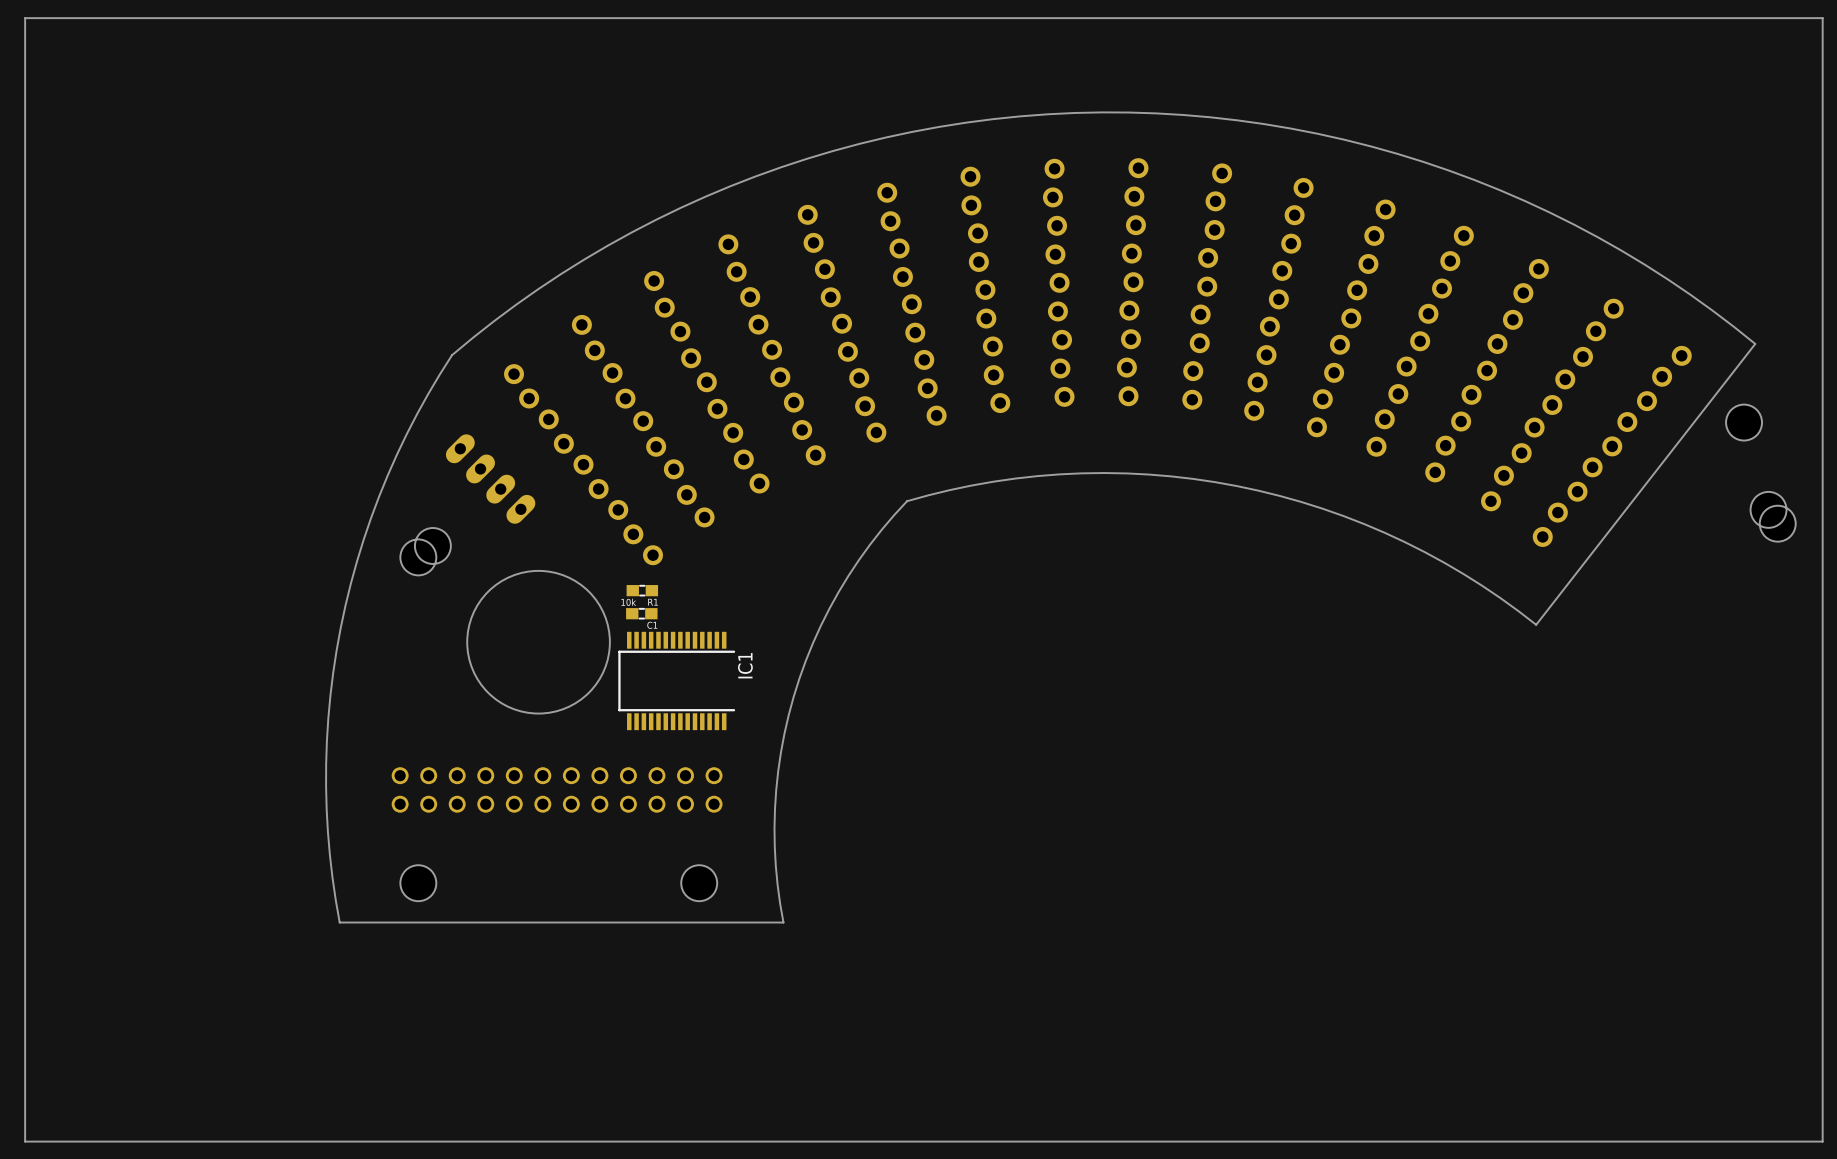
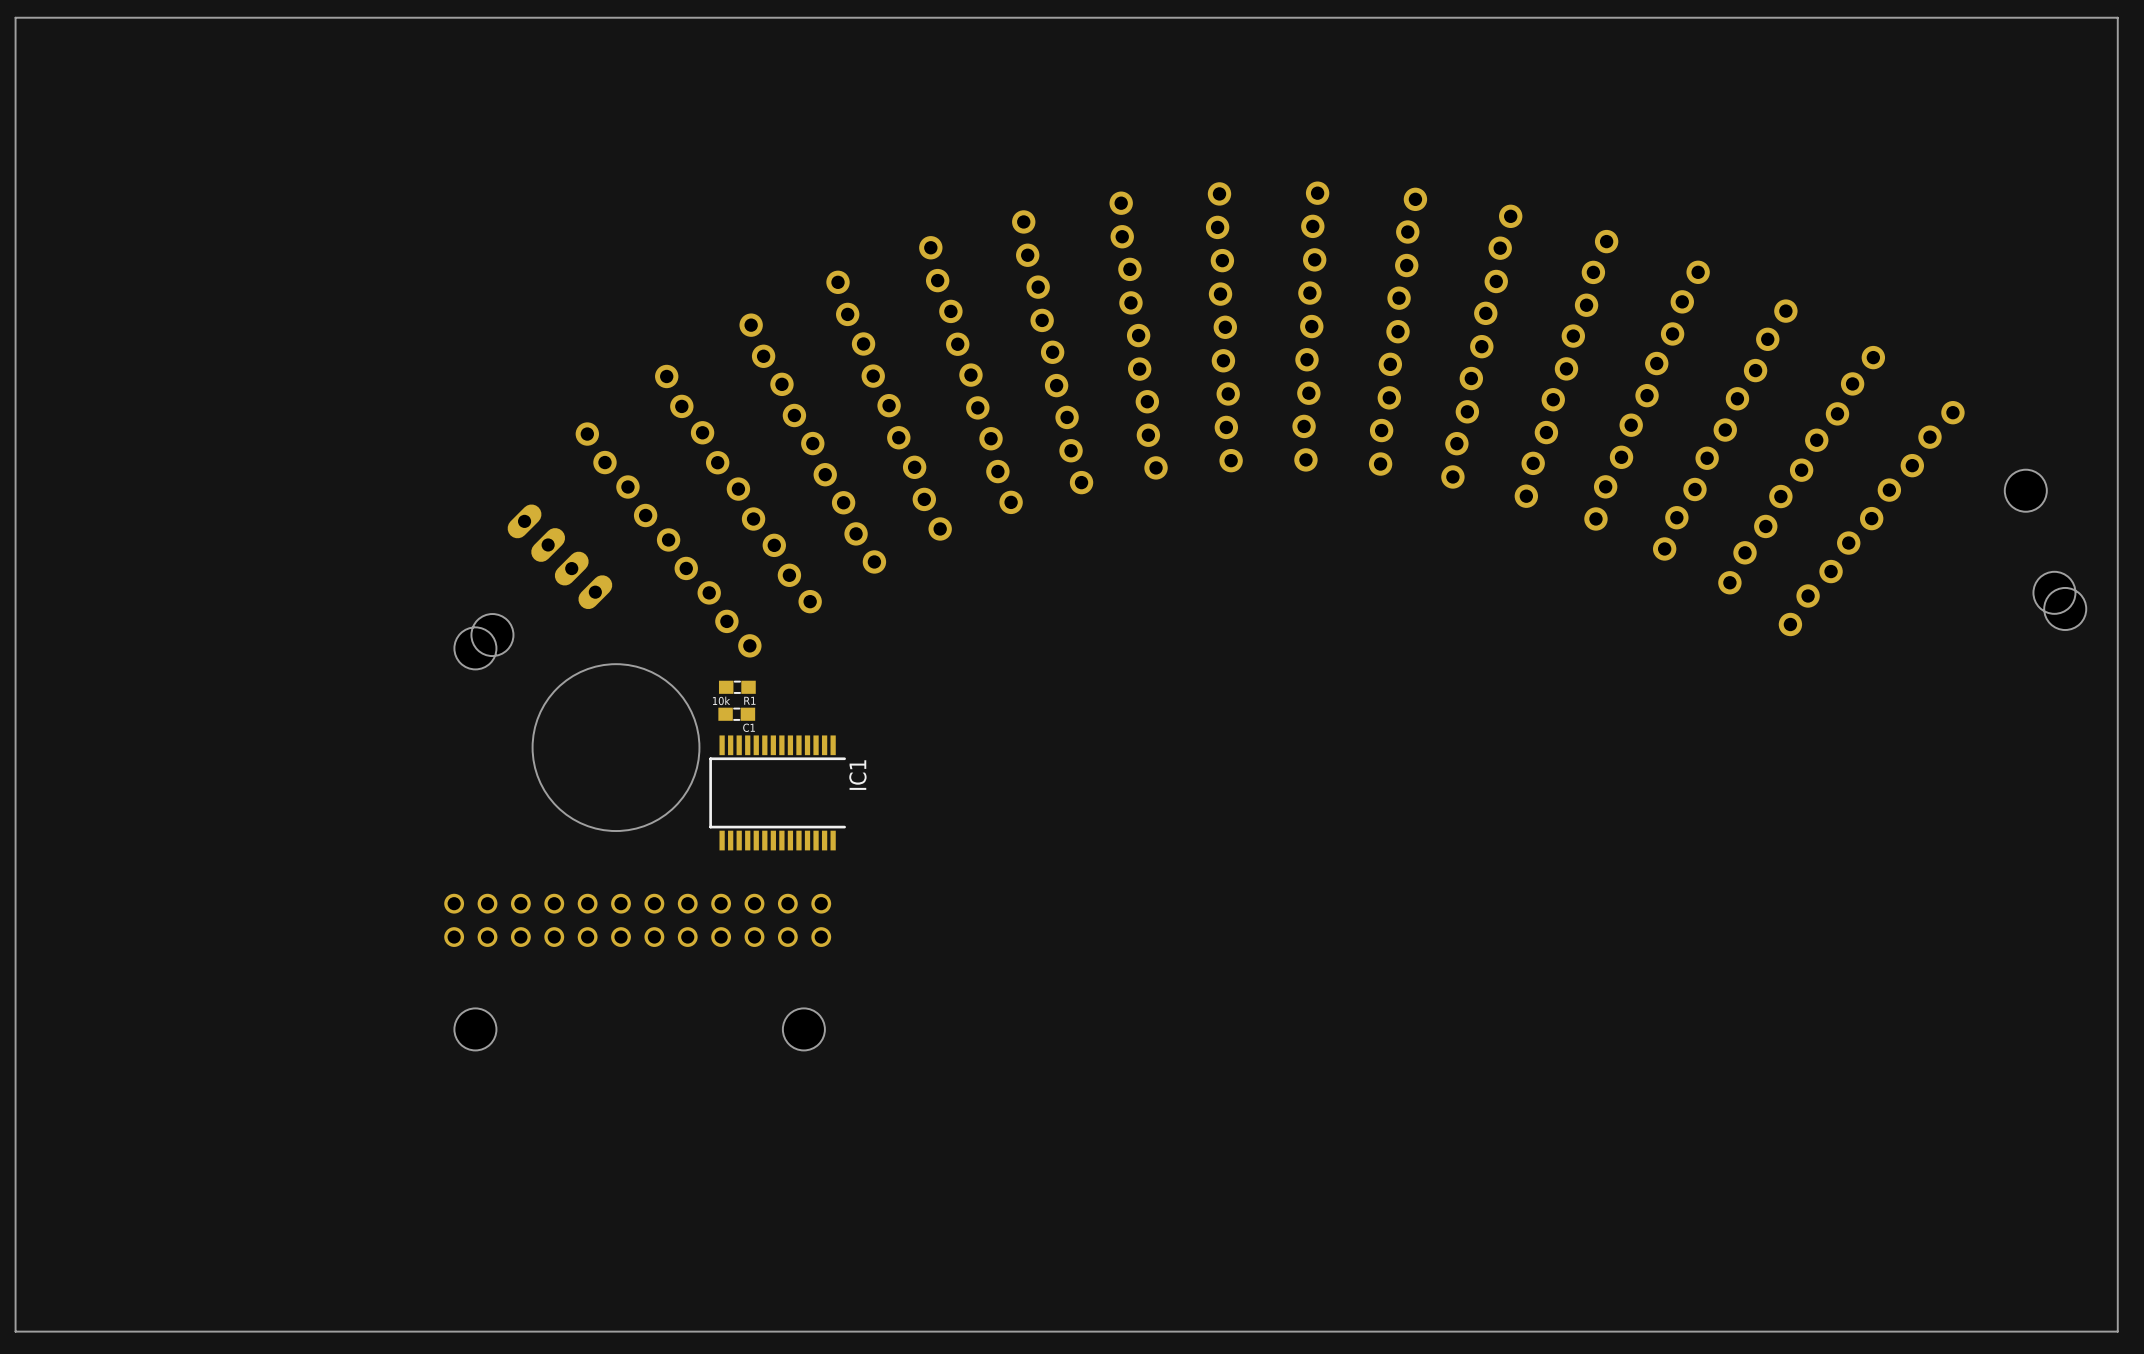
board edge: (1755, 343) (1536, 624) (1463, 573) (1404, 542) (1322, 508) (1236, 486) (1148, 474) (1082, 473) (1015, 478) (928, 495) (907, 501) (881, 529) (858, 560) (829, 608) (813, 643) (799, 678) (784, 733) (776, 790) (774, 828) (775, 866) (783, 922) (339, 922) (329, 854) (326, 786) (328, 718) (336, 650) (345, 605) (363, 539) (387, 475) (417, 413) (452, 355) (516, 304) (561, 273) (631, 232) (730, 186) (806, 158) (859, 143) (939, 126) (992, 119) (1074, 112) (1128, 112) (1183, 114) (1264, 124) (1344, 139) (1397, 153) (1448, 170) (1524, 200) (1597, 237) (1644, 264) (1690, 294) (1755, 343) -> none

